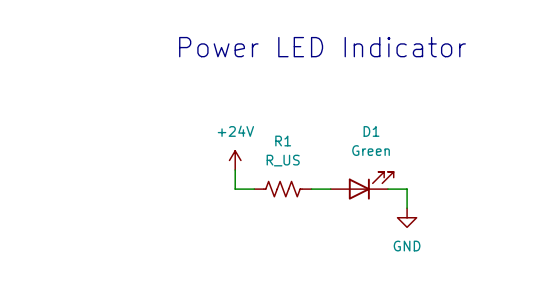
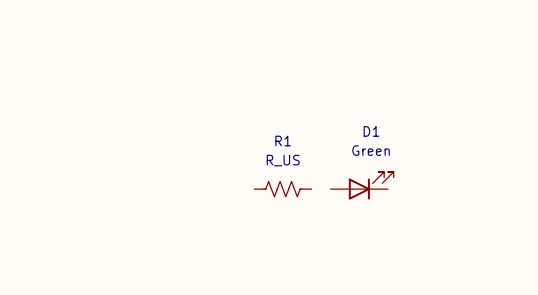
text: Power LED Indicator (322, 47) -> none
power symbol: +24V (235, 160) -> none
wire: (235, 170) (235, 189) (254, 189) -> none
wire: (311, 189) (330, 189) -> none
wire: (387, 189) (407, 189) (407, 208) -> none
power symbol: GND (407, 217) -> none

